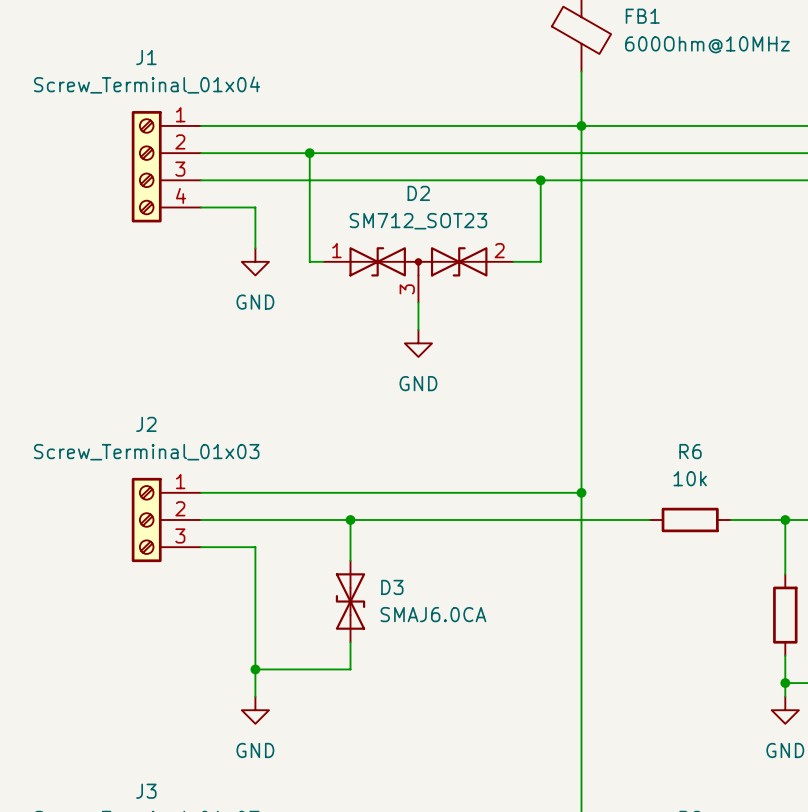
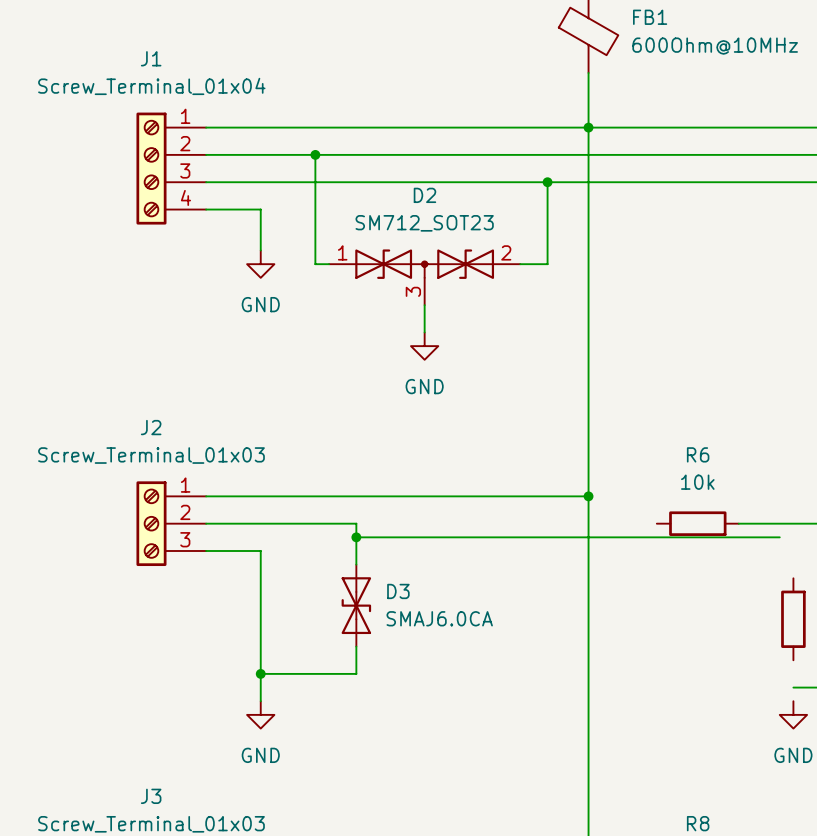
wire: (350, 520) (649, 520) -> none
junction position: (350, 520) -> (356, 537)
wire: (785, 520) (785, 574) -> none
junction: (785, 520) -> none
wire: none -> (356, 537) (779, 537)
wire: (785, 655) (785, 696) -> none
junction: (785, 683) -> none

